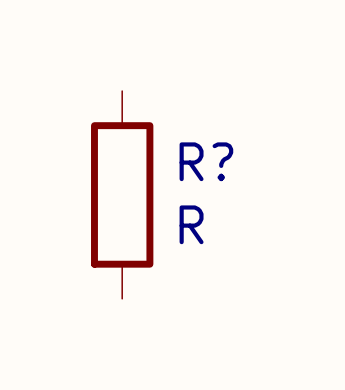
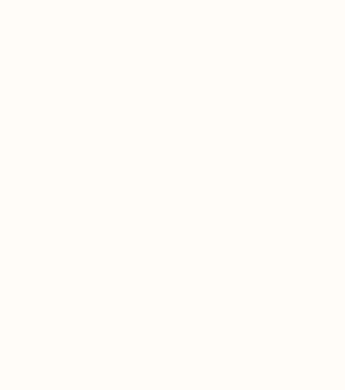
R?: R (122, 194) -> none

